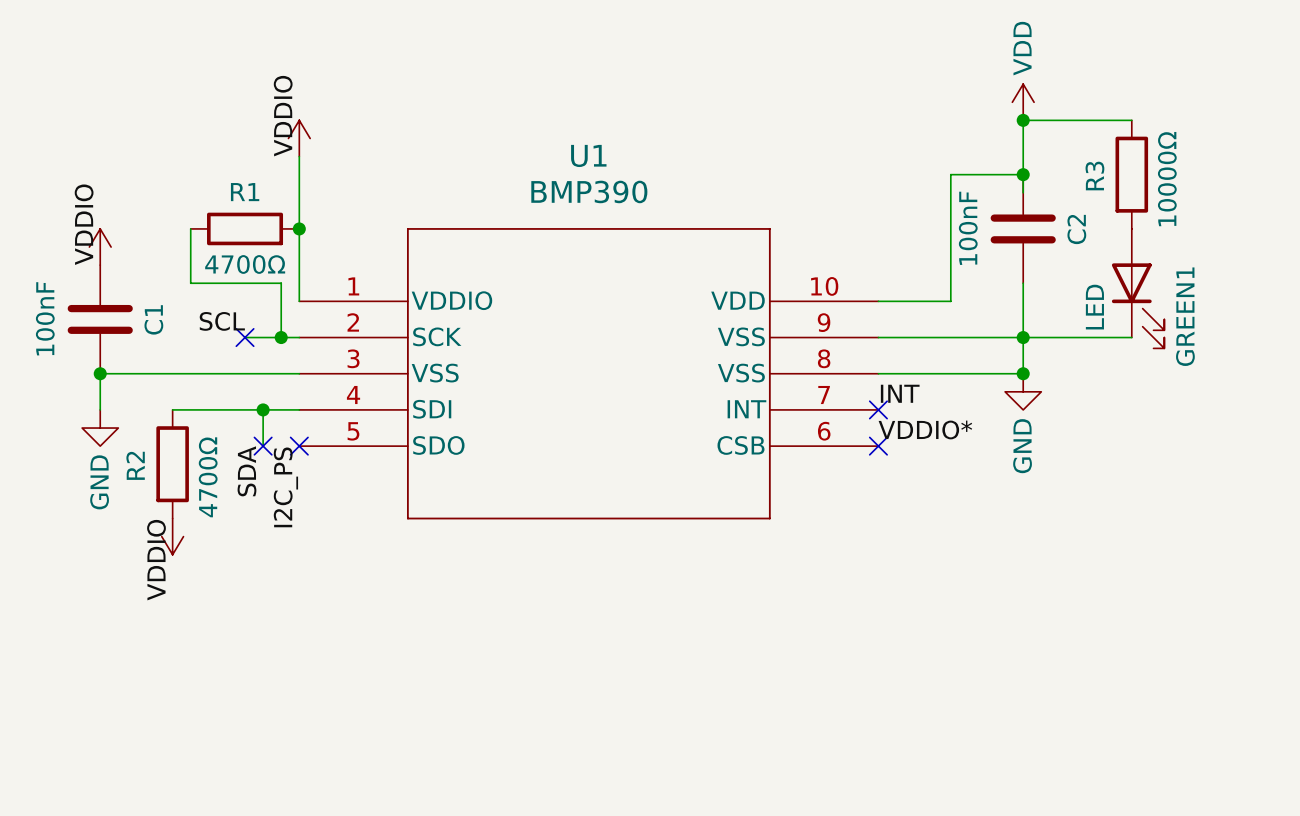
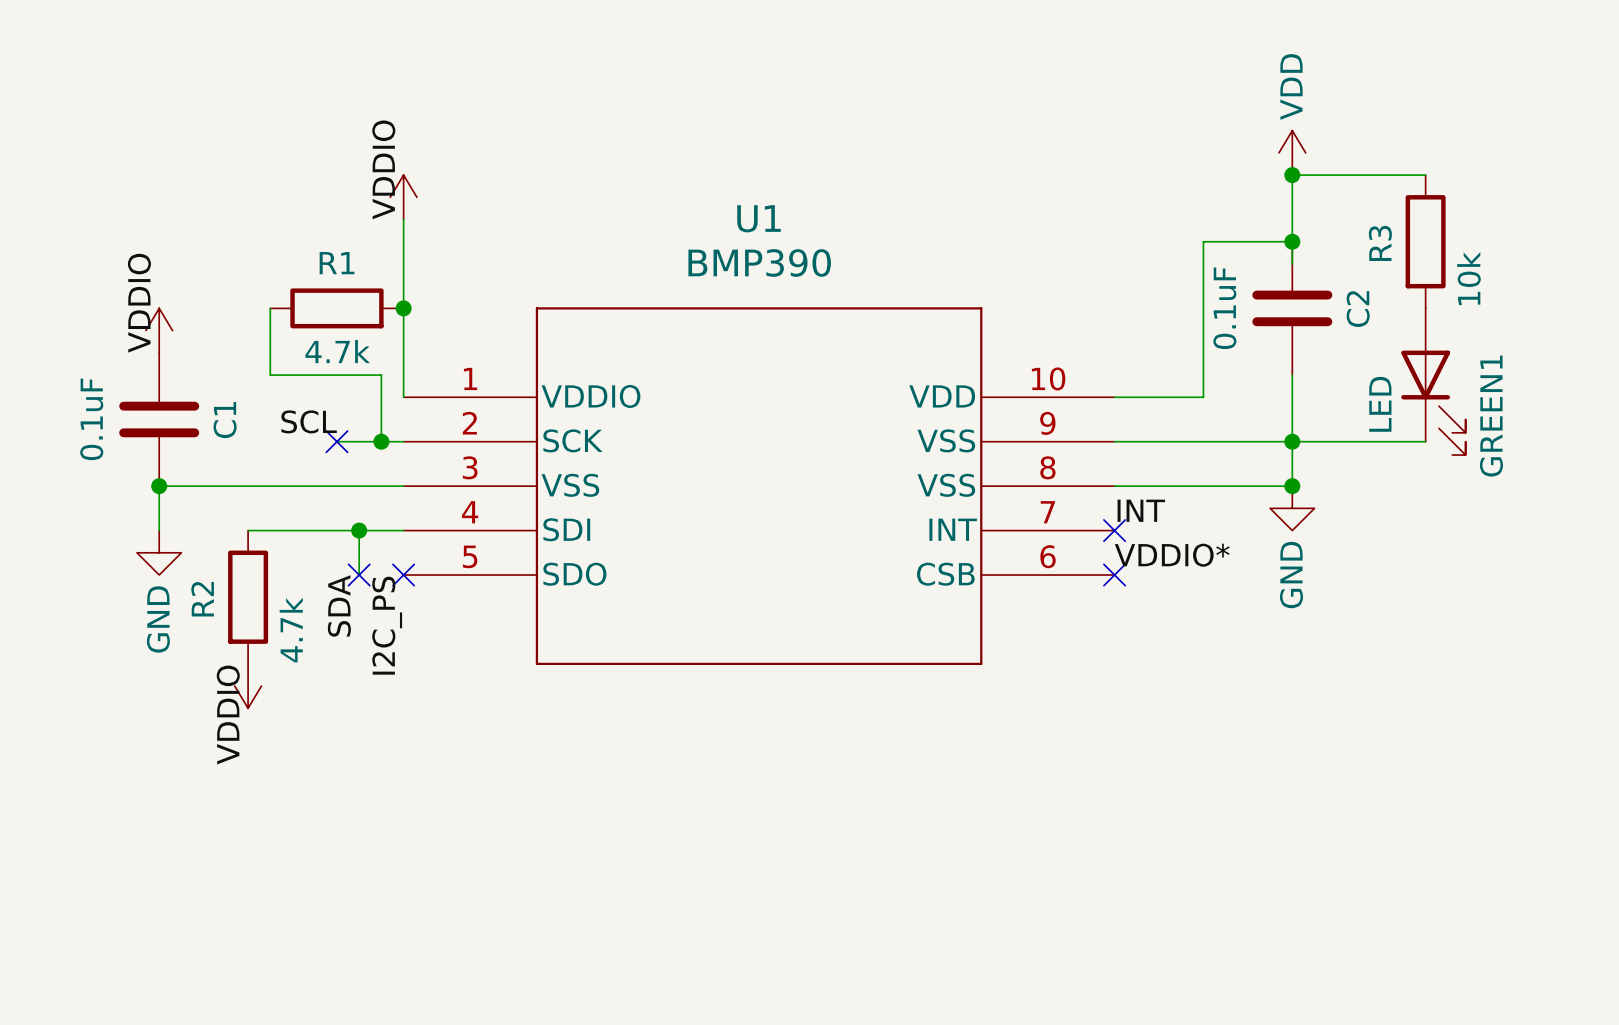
R3 value: 10000Ω (1167, 179) -> 10k (1468, 278)
C2 value: 100nF (968, 228) -> 0.1uF (1224, 308)
R1 value: 4700Ω (245, 264) -> 4.7k (337, 351)
C1 value: 100nF (45, 318) -> 0.1uF (91, 419)
R2 value: 4700Ω (208, 477) -> 4.7k (291, 630)

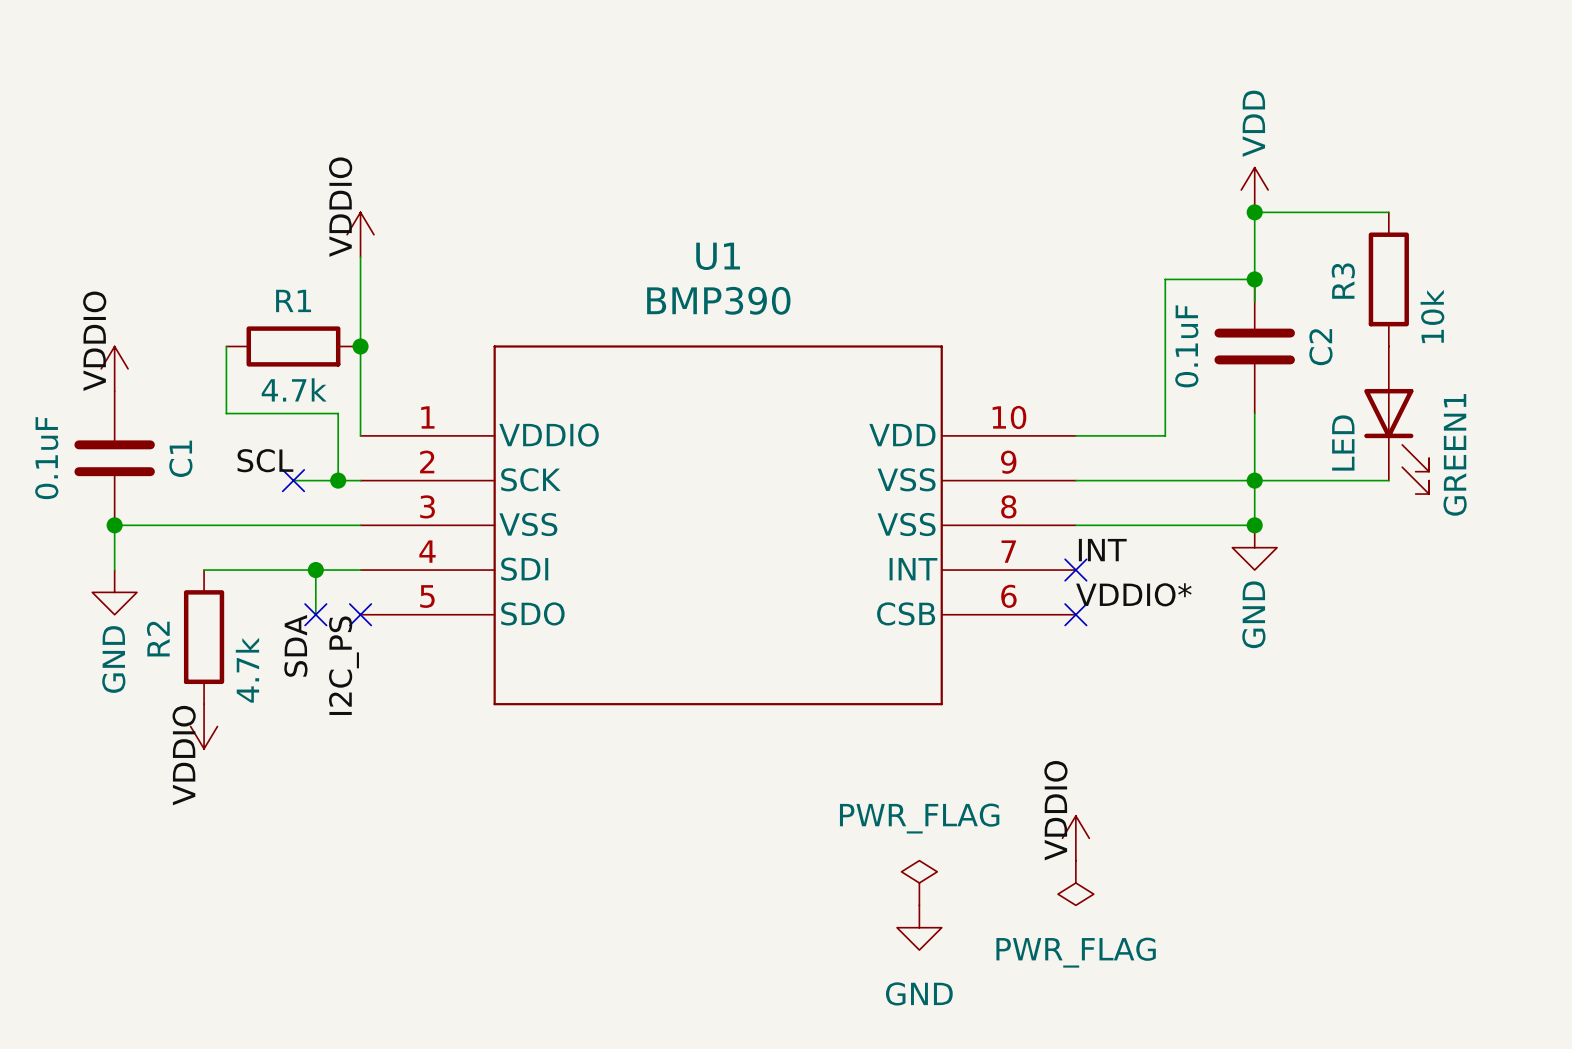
label: none -> VDDIO (1055, 810)
power symbol: none -> (1075, 838)
power symbol: none -> PWR_FLAG (919, 882)
power symbol: none -> PWR_FLAG (1075, 882)
power symbol: none -> GND (919, 927)

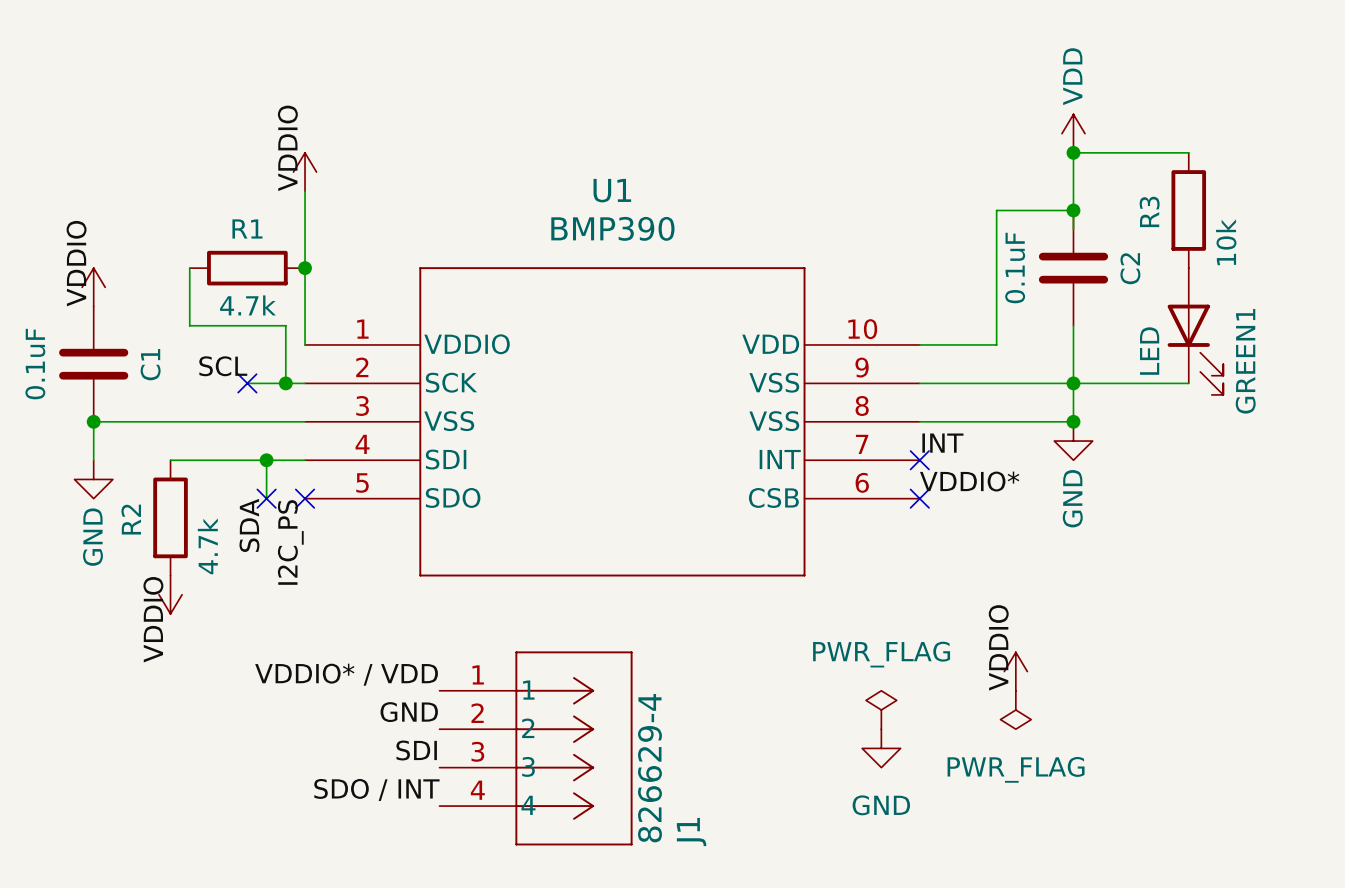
label position: VDDIO (1055, 810) -> VDDIO (998, 647)
label: none -> VDDIO* / VDD (346, 674)
power symbol position: (1075, 838) -> (1015, 671)
power symbol: none -> PWR_FLAG (1015, 710)
label: none -> GND (409, 712)
power symbol: PWR_FLAG (919, 882) -> none
power symbol rotation: 0° (1075, 882) -> 180° (881, 710)
power symbol position: PWR_FLAG (1075, 882) -> PWR_FLAG (881, 710)
J1: none -> 826629-4 (536, 748)
label: none -> SDI (416, 750)
power symbol position: GND (919, 927) -> GND (881, 748)
label: none -> SDO / INT (376, 789)

